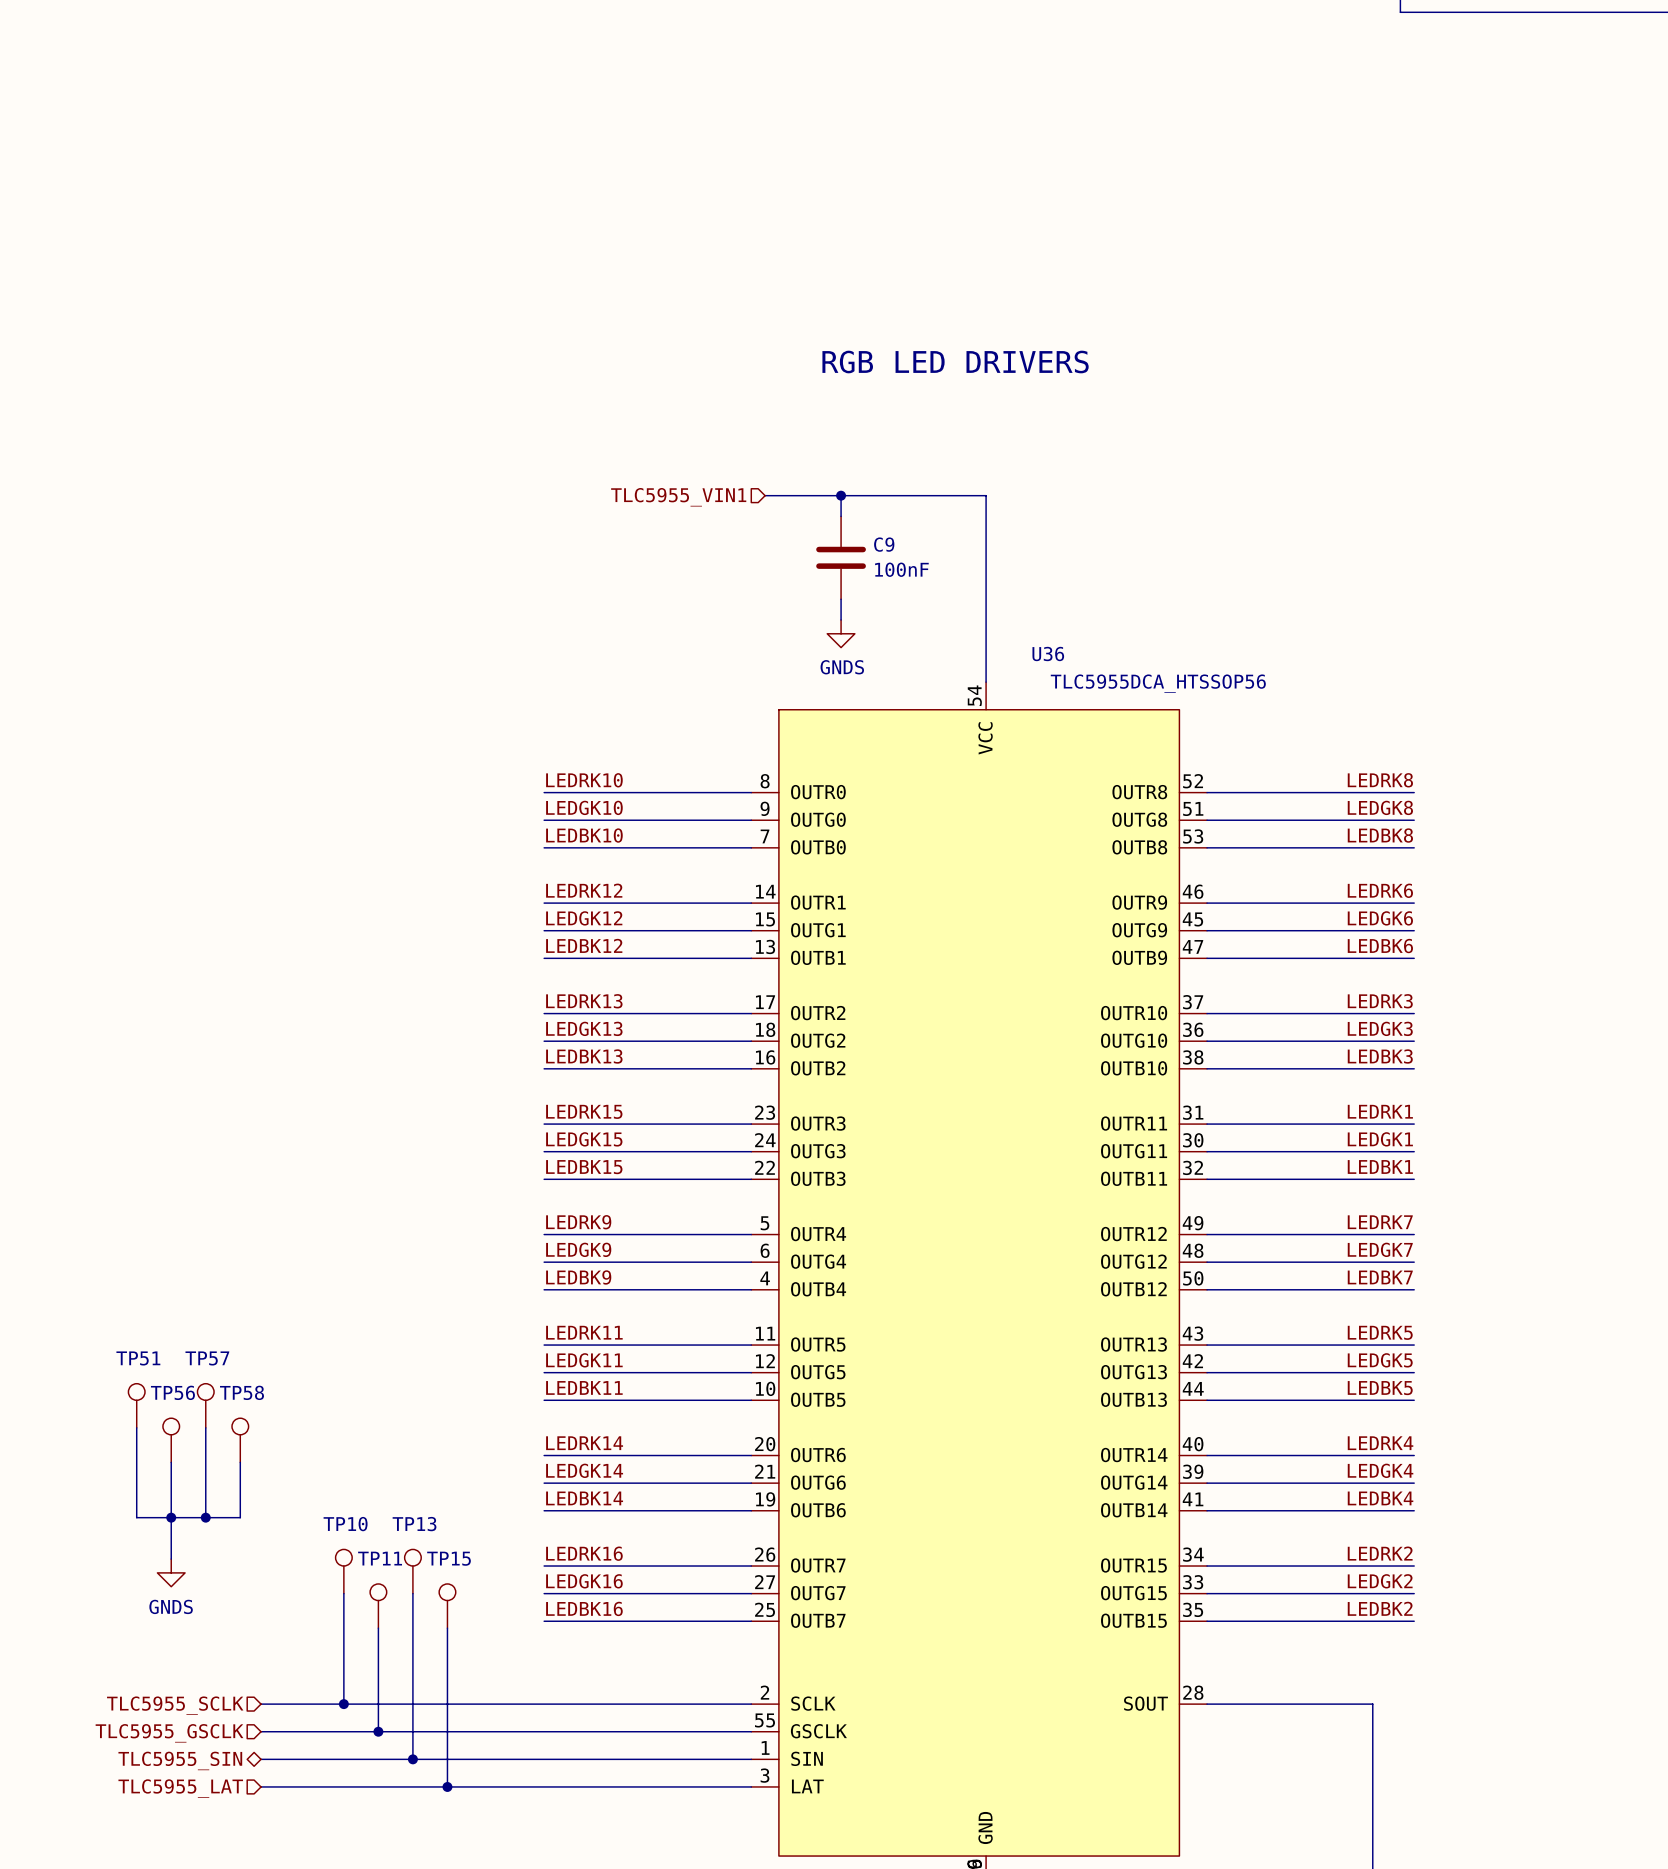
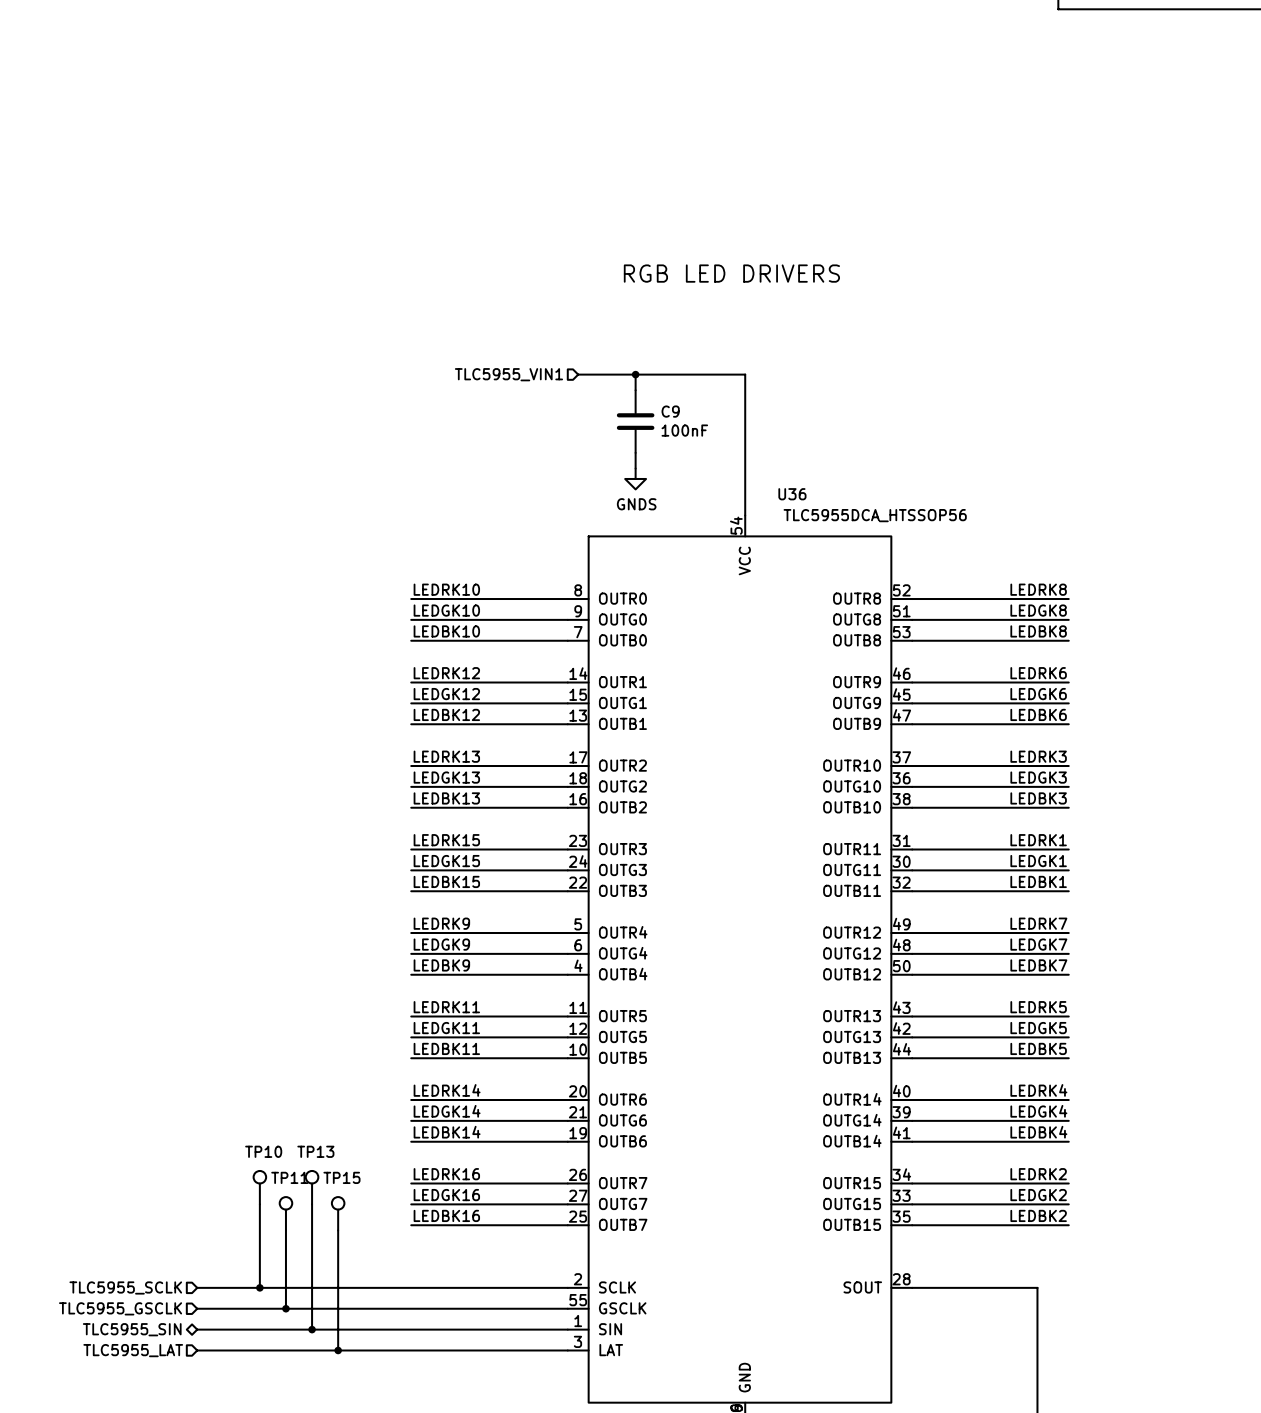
TP51: (136, 1405) -> none
TP57: (205, 1405) -> none
wire: (136, 1427) (136, 1517) (240, 1517) (240, 1462) -> none
wire: (205, 1427) (205, 1517) -> none
TP56: (171, 1440) -> none
TP58: (240, 1440) -> none
wire: (171, 1462) (171, 1559) -> none
junction: (171, 1517) -> none
junction: (205, 1517) -> none
power symbol: GNDS (171, 1572) -> none

